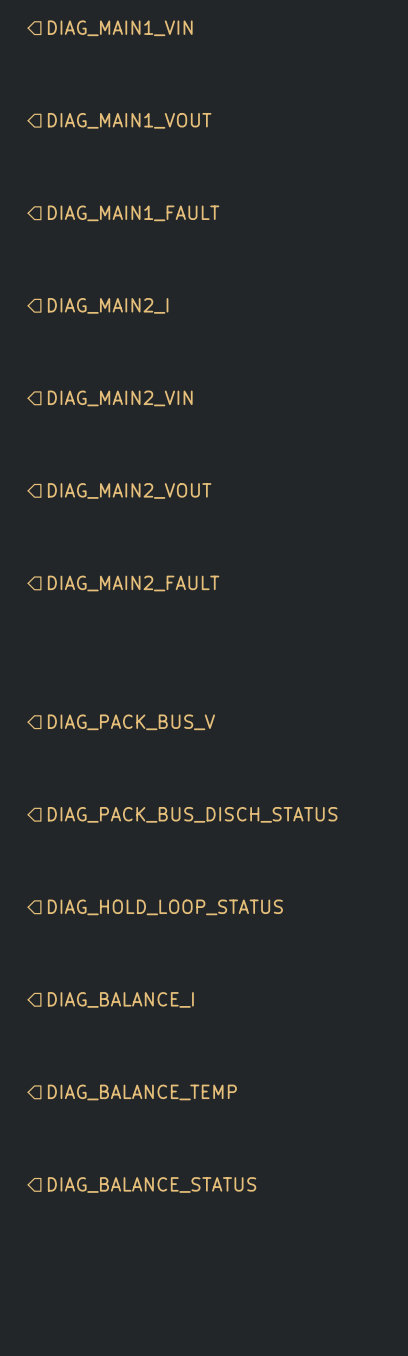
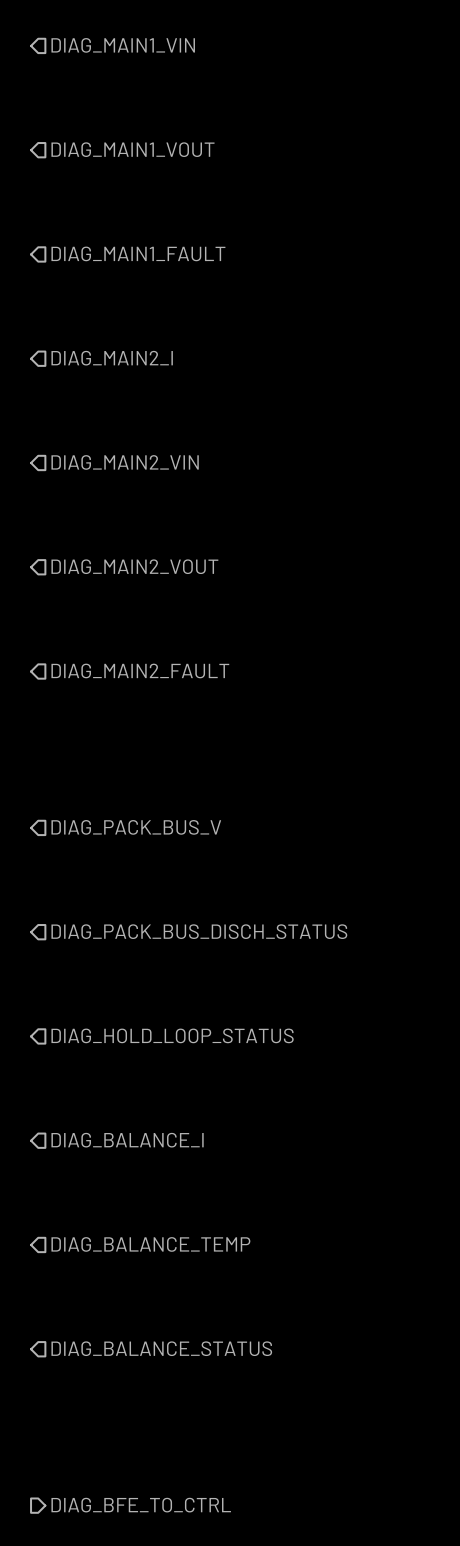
hierarchical label: none -> DIAG_BFE_TO_CTRL (141, 1505)

